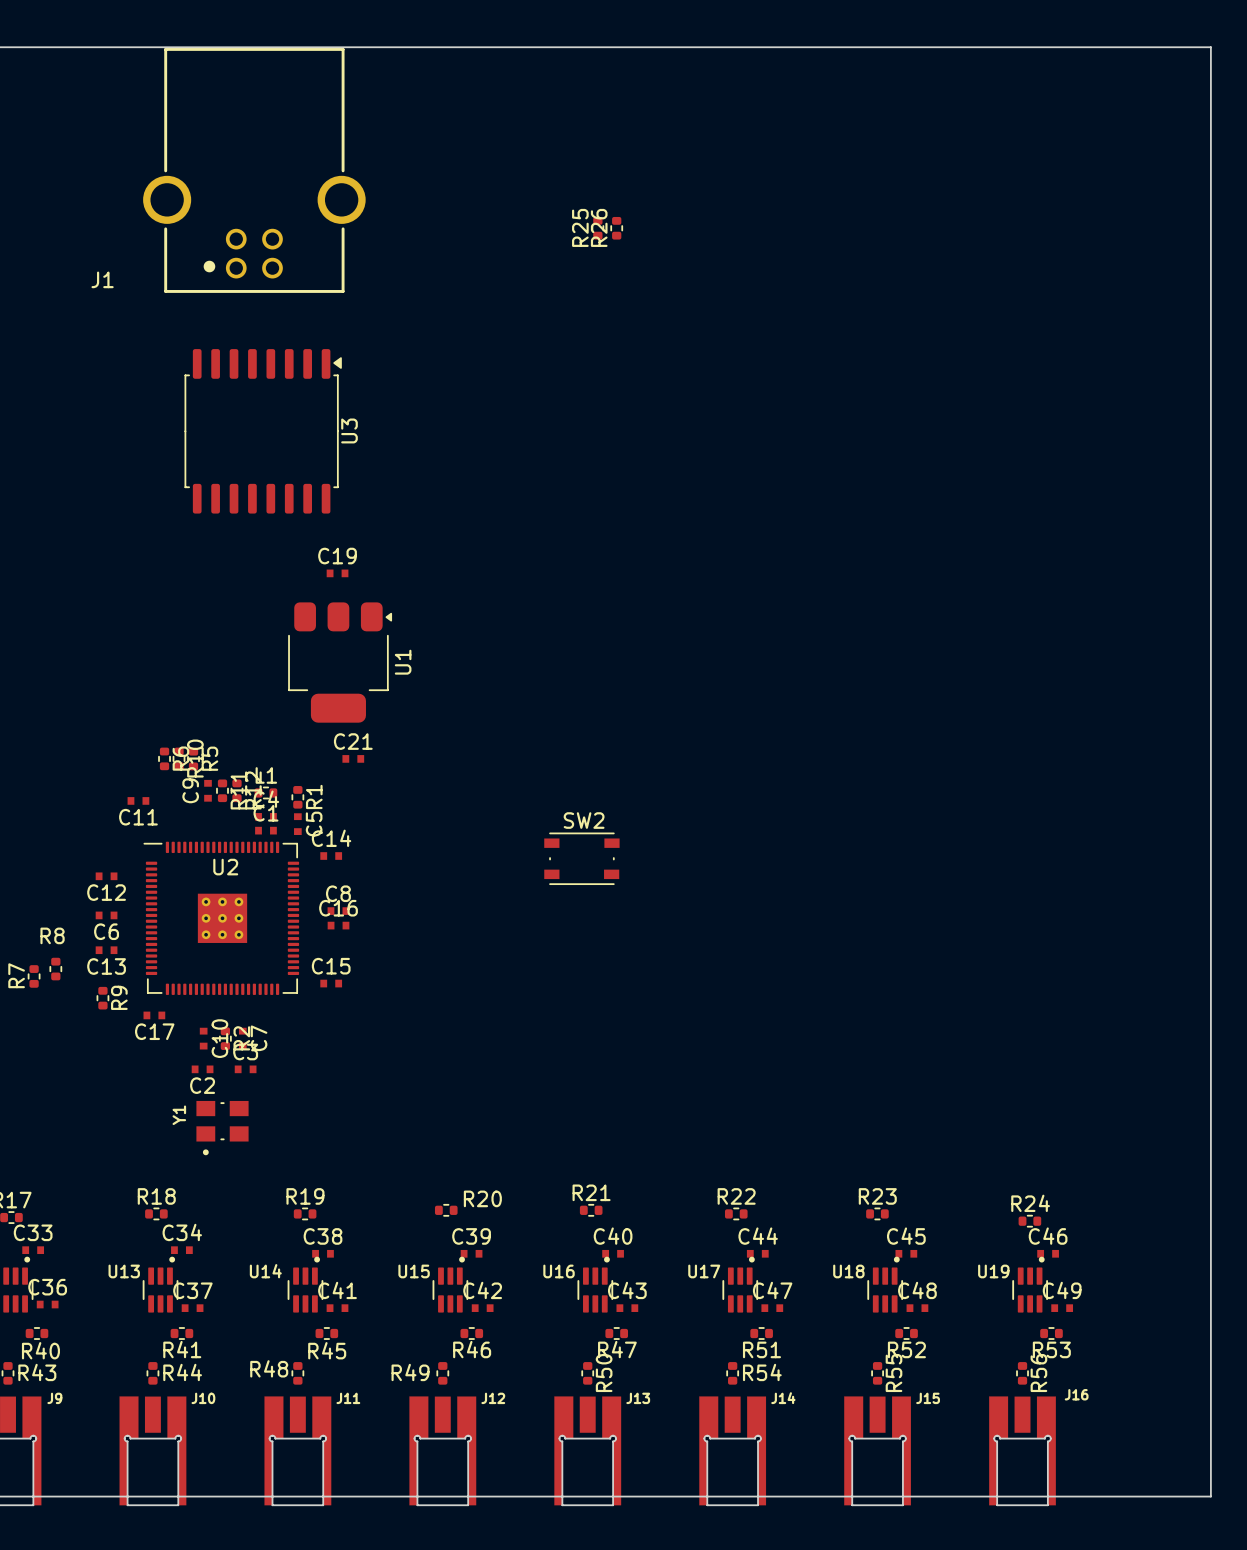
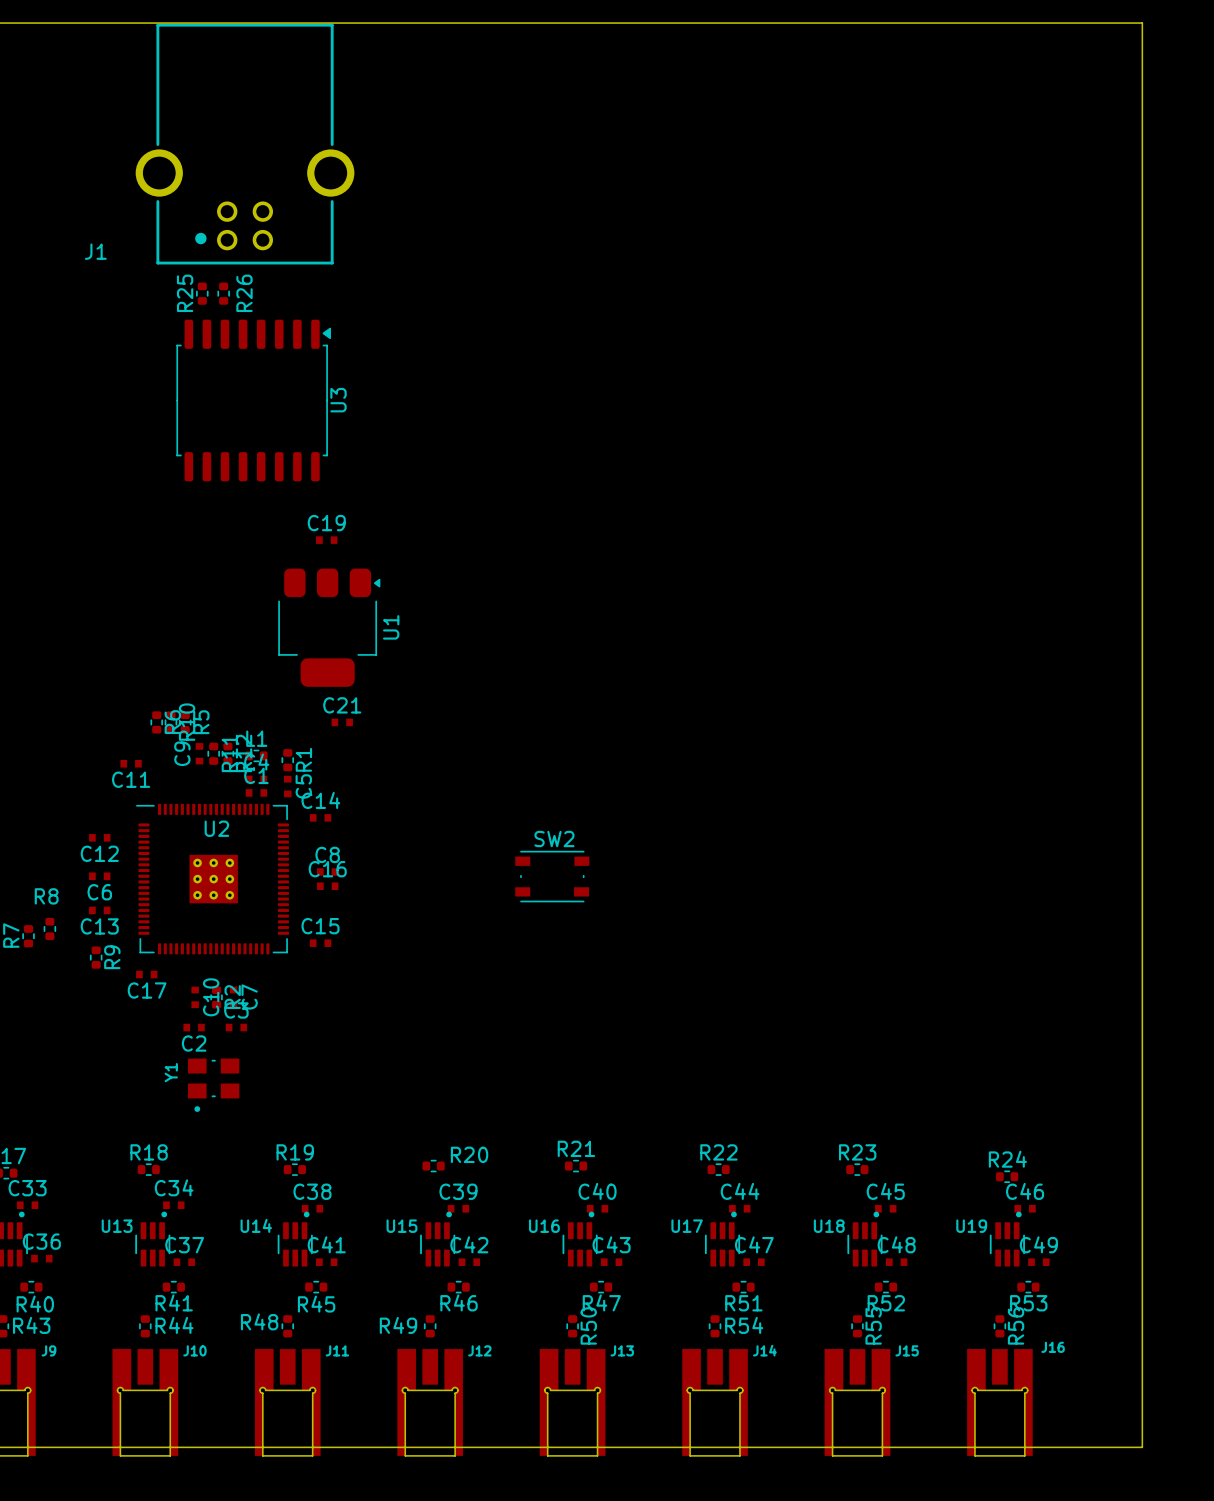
board edge: (1167, 47) (1210, 47) (1210, 1496) (1167, 1496) -> (1142, 23) (1142, 1447)
R26 name position: R26 (599, 227) -> R26 (244, 293)
R25 position: (597, 228) -> (202, 293)
R26 position: (616, 228) -> (223, 293)
SW2 position: (581, 858) -> (552, 876)

